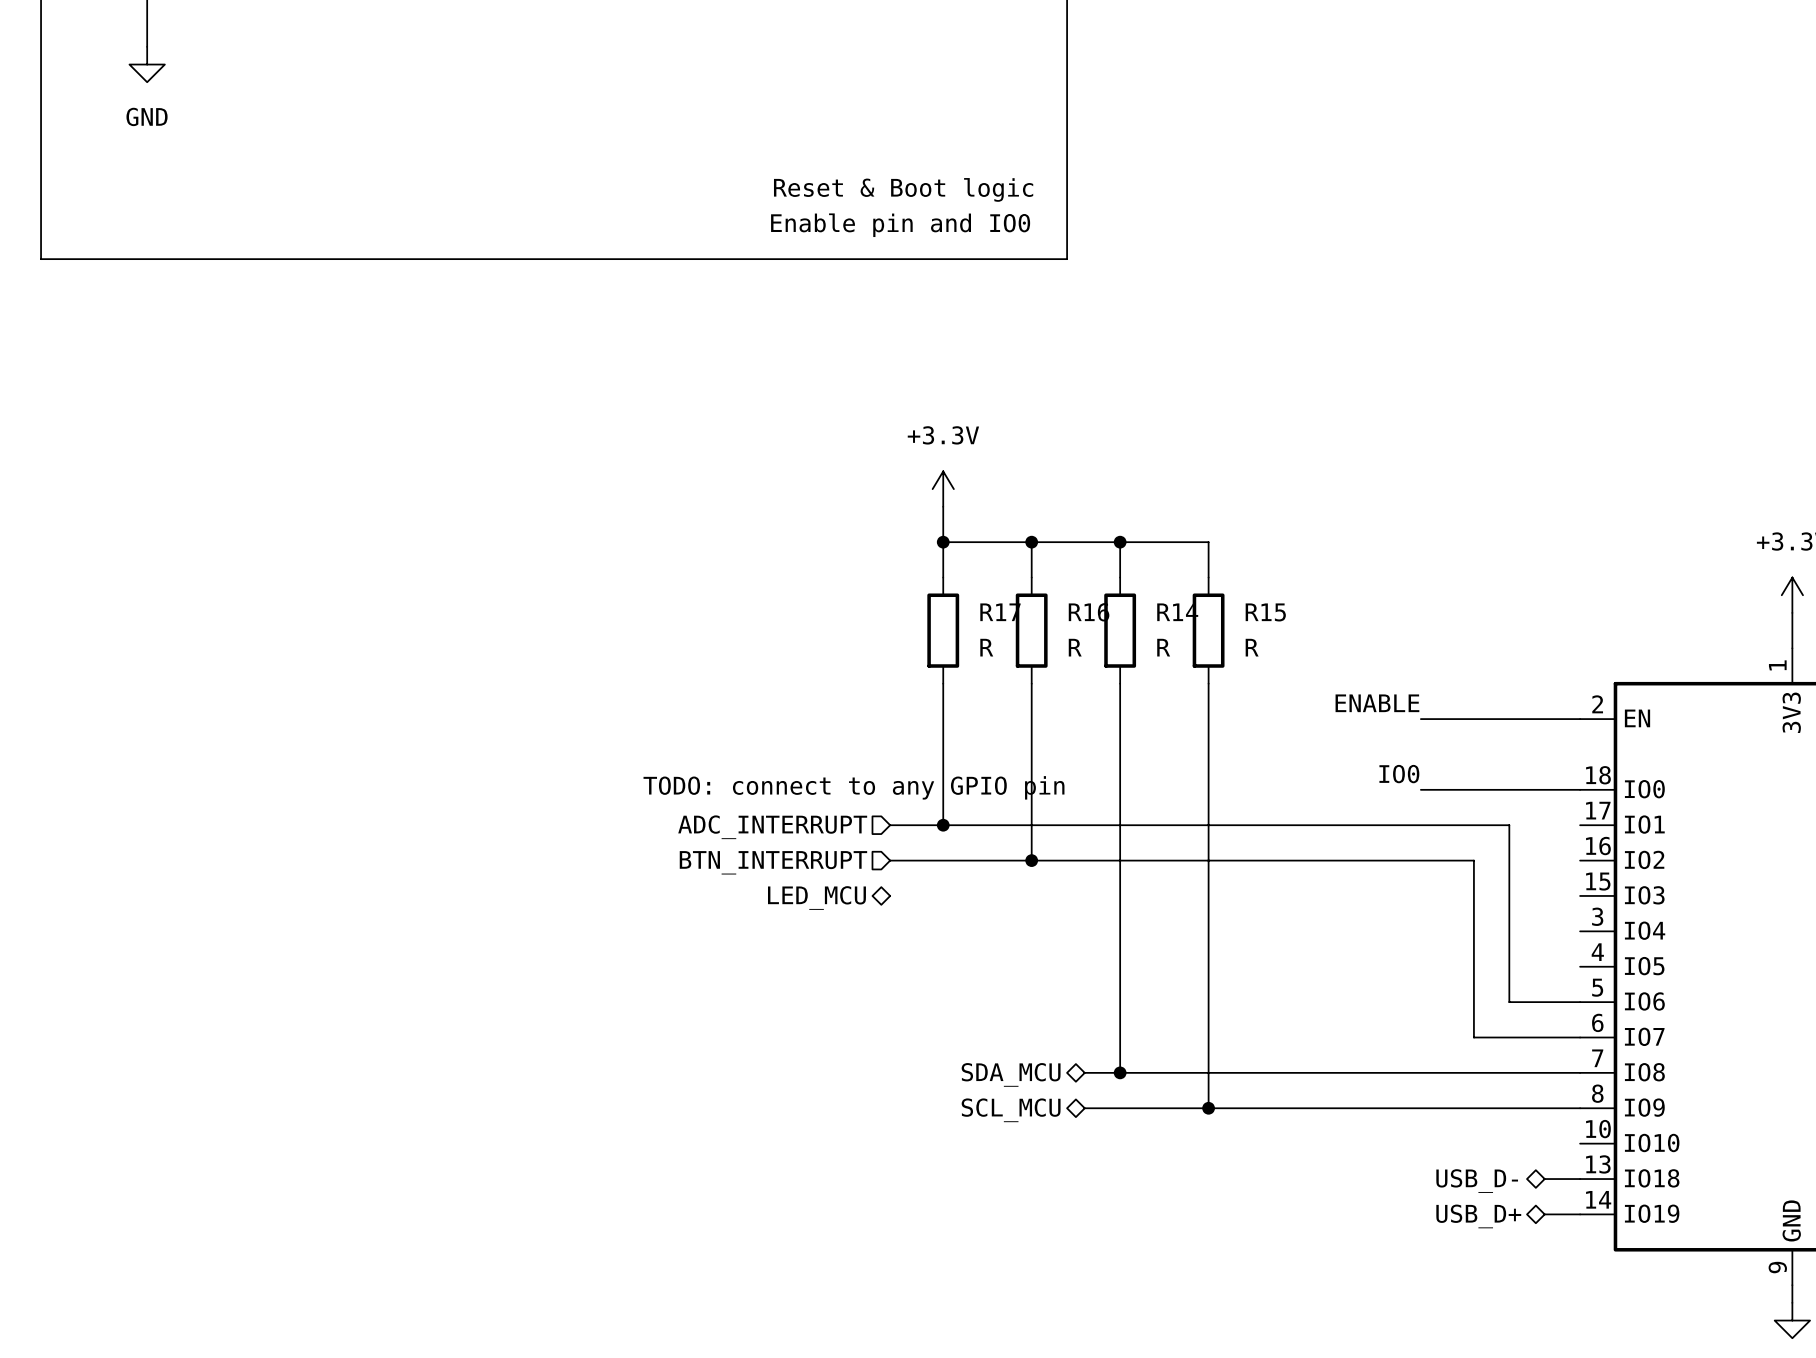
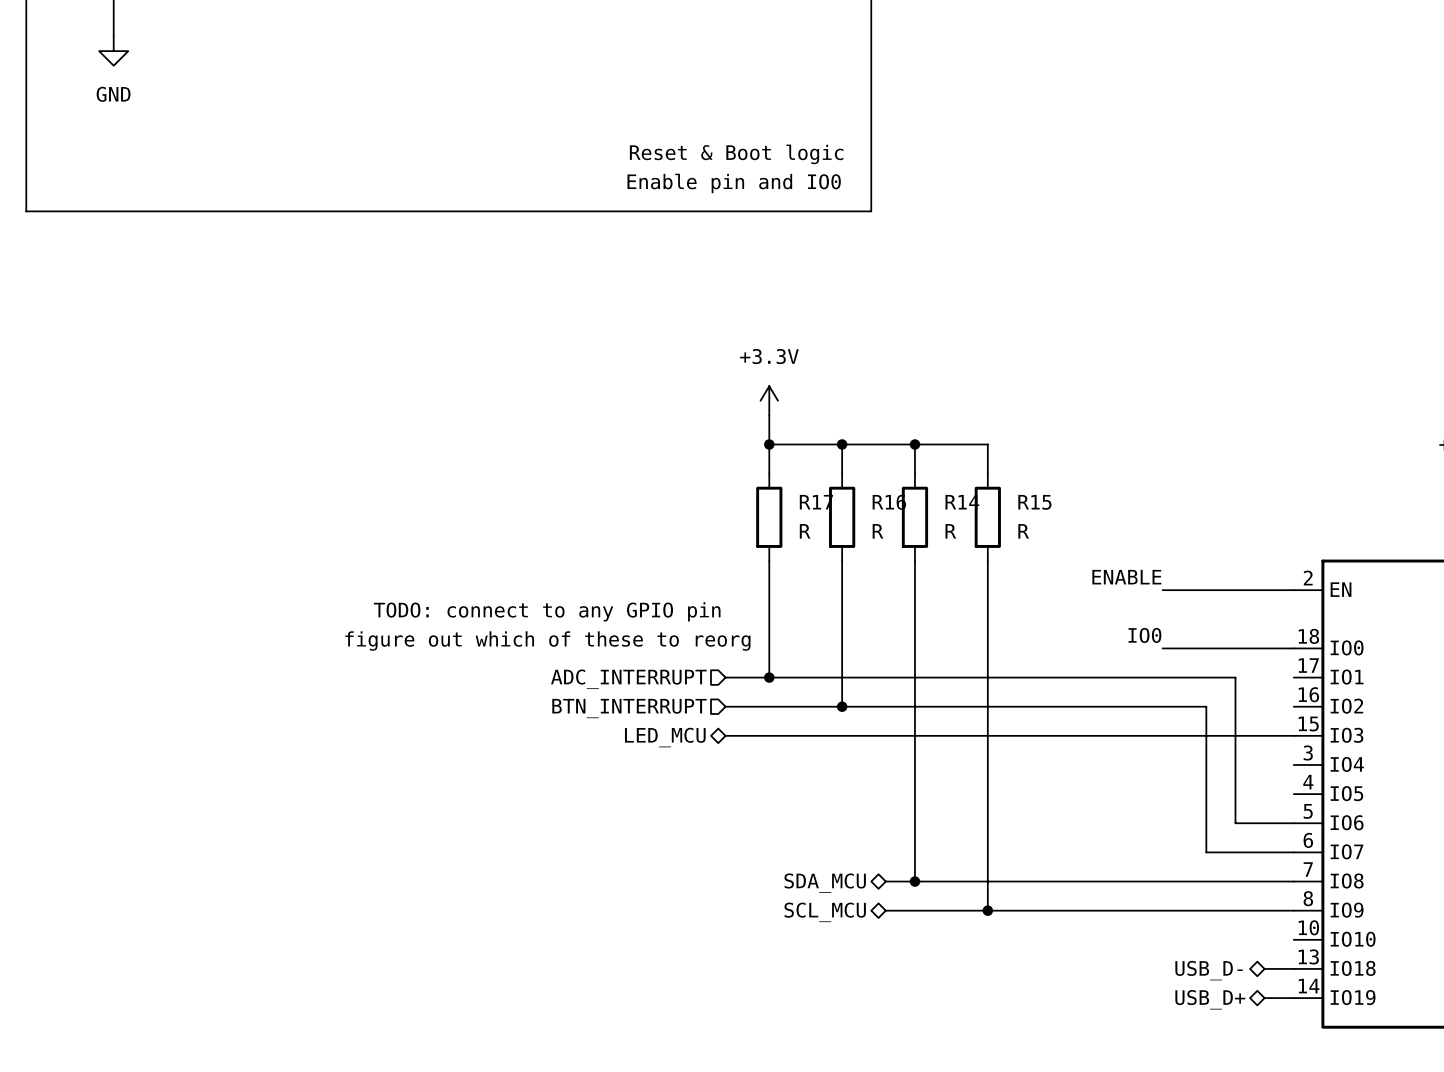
text: none -> figure out which of these to reorg (547, 641)
text position: TODO: connect to any GPIO pin (853, 787) -> TODO: connect to any GPIO pin (547, 611)
wire: none -> (725, 735) (1293, 735)

